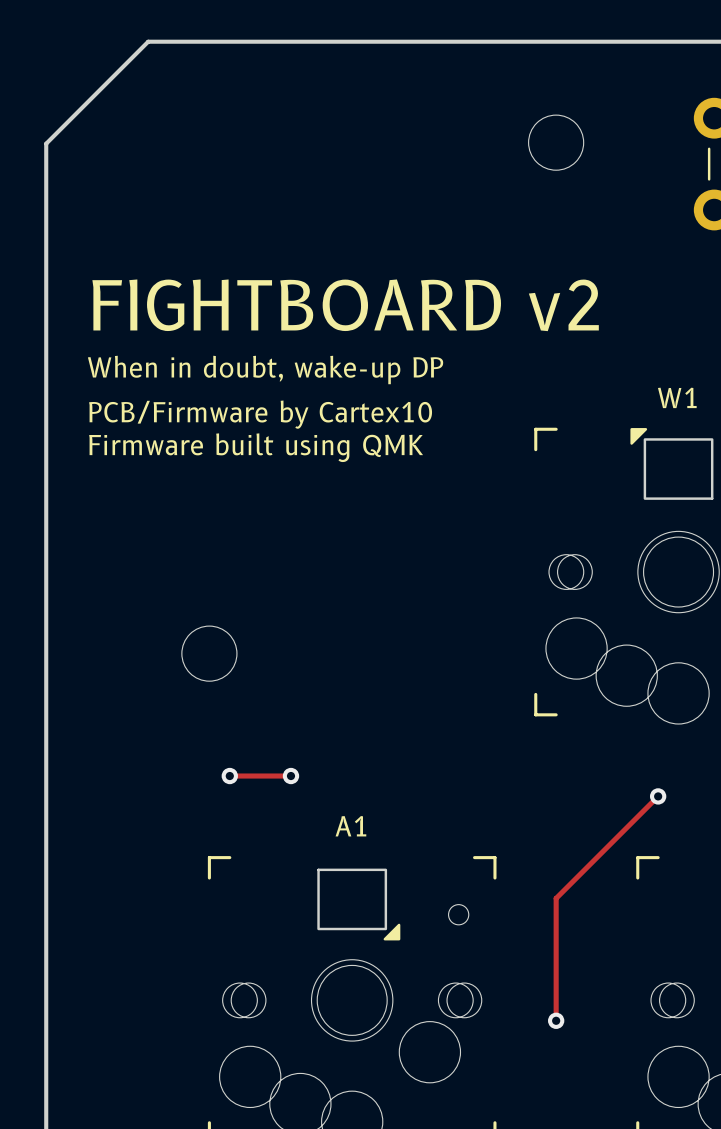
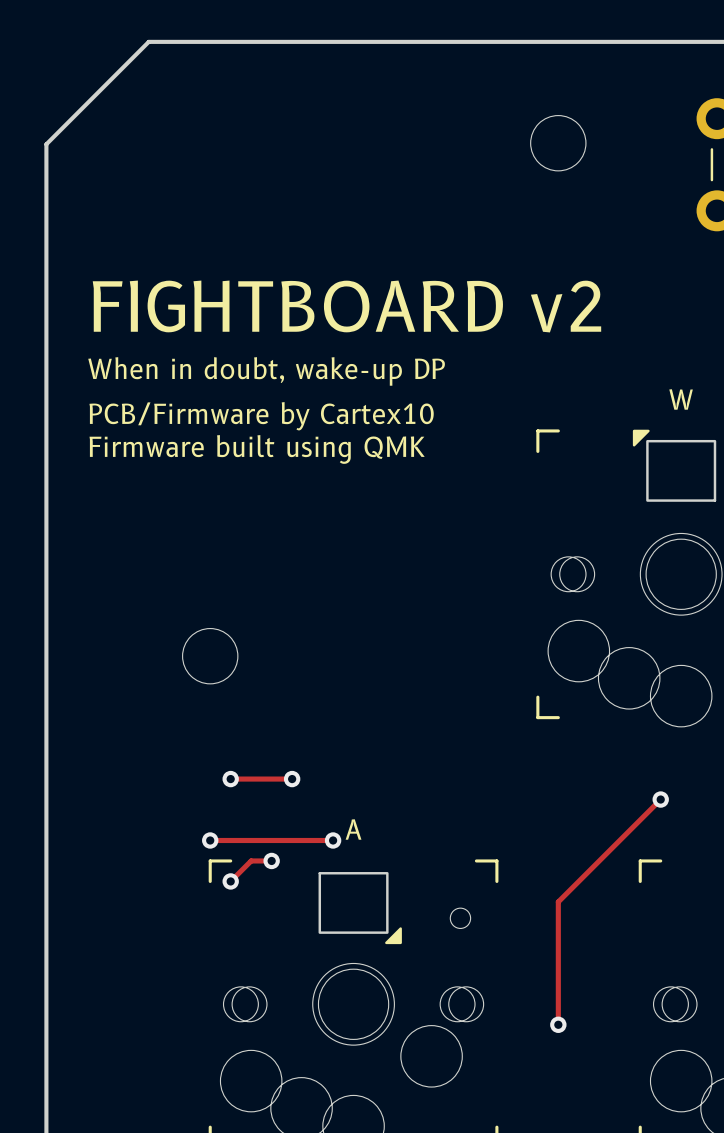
W1 name: W1 (677, 397) -> W (681, 399)
A1 name: A1 (350, 826) -> A (353, 829)
track: none -> (210, 840) (333, 840)
via: none -> (210, 840)
via: none -> (333, 840)
track: none -> (271, 860) (251, 860) (230, 881)
via: none -> (271, 860)
via: none -> (230, 881)

